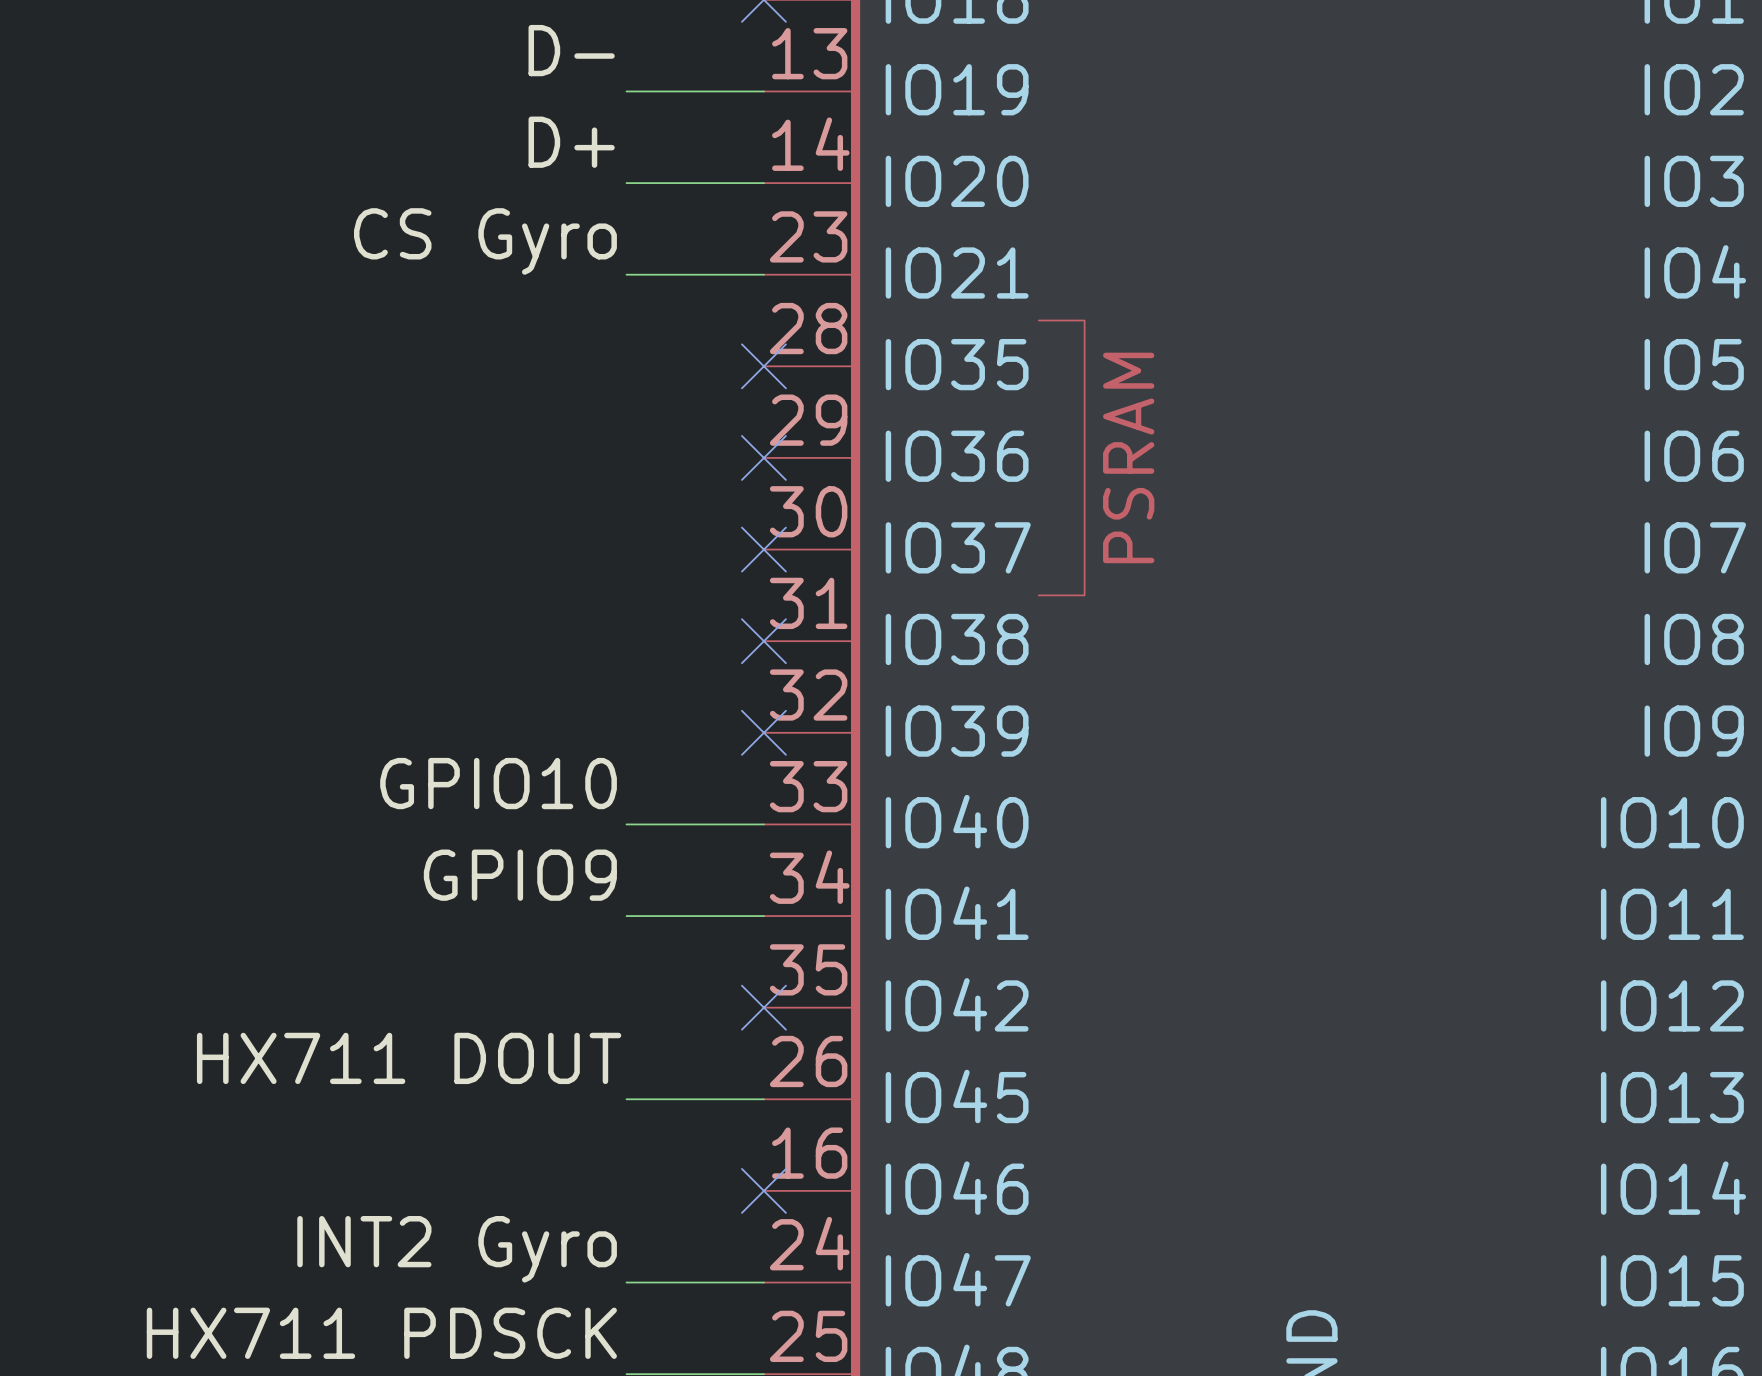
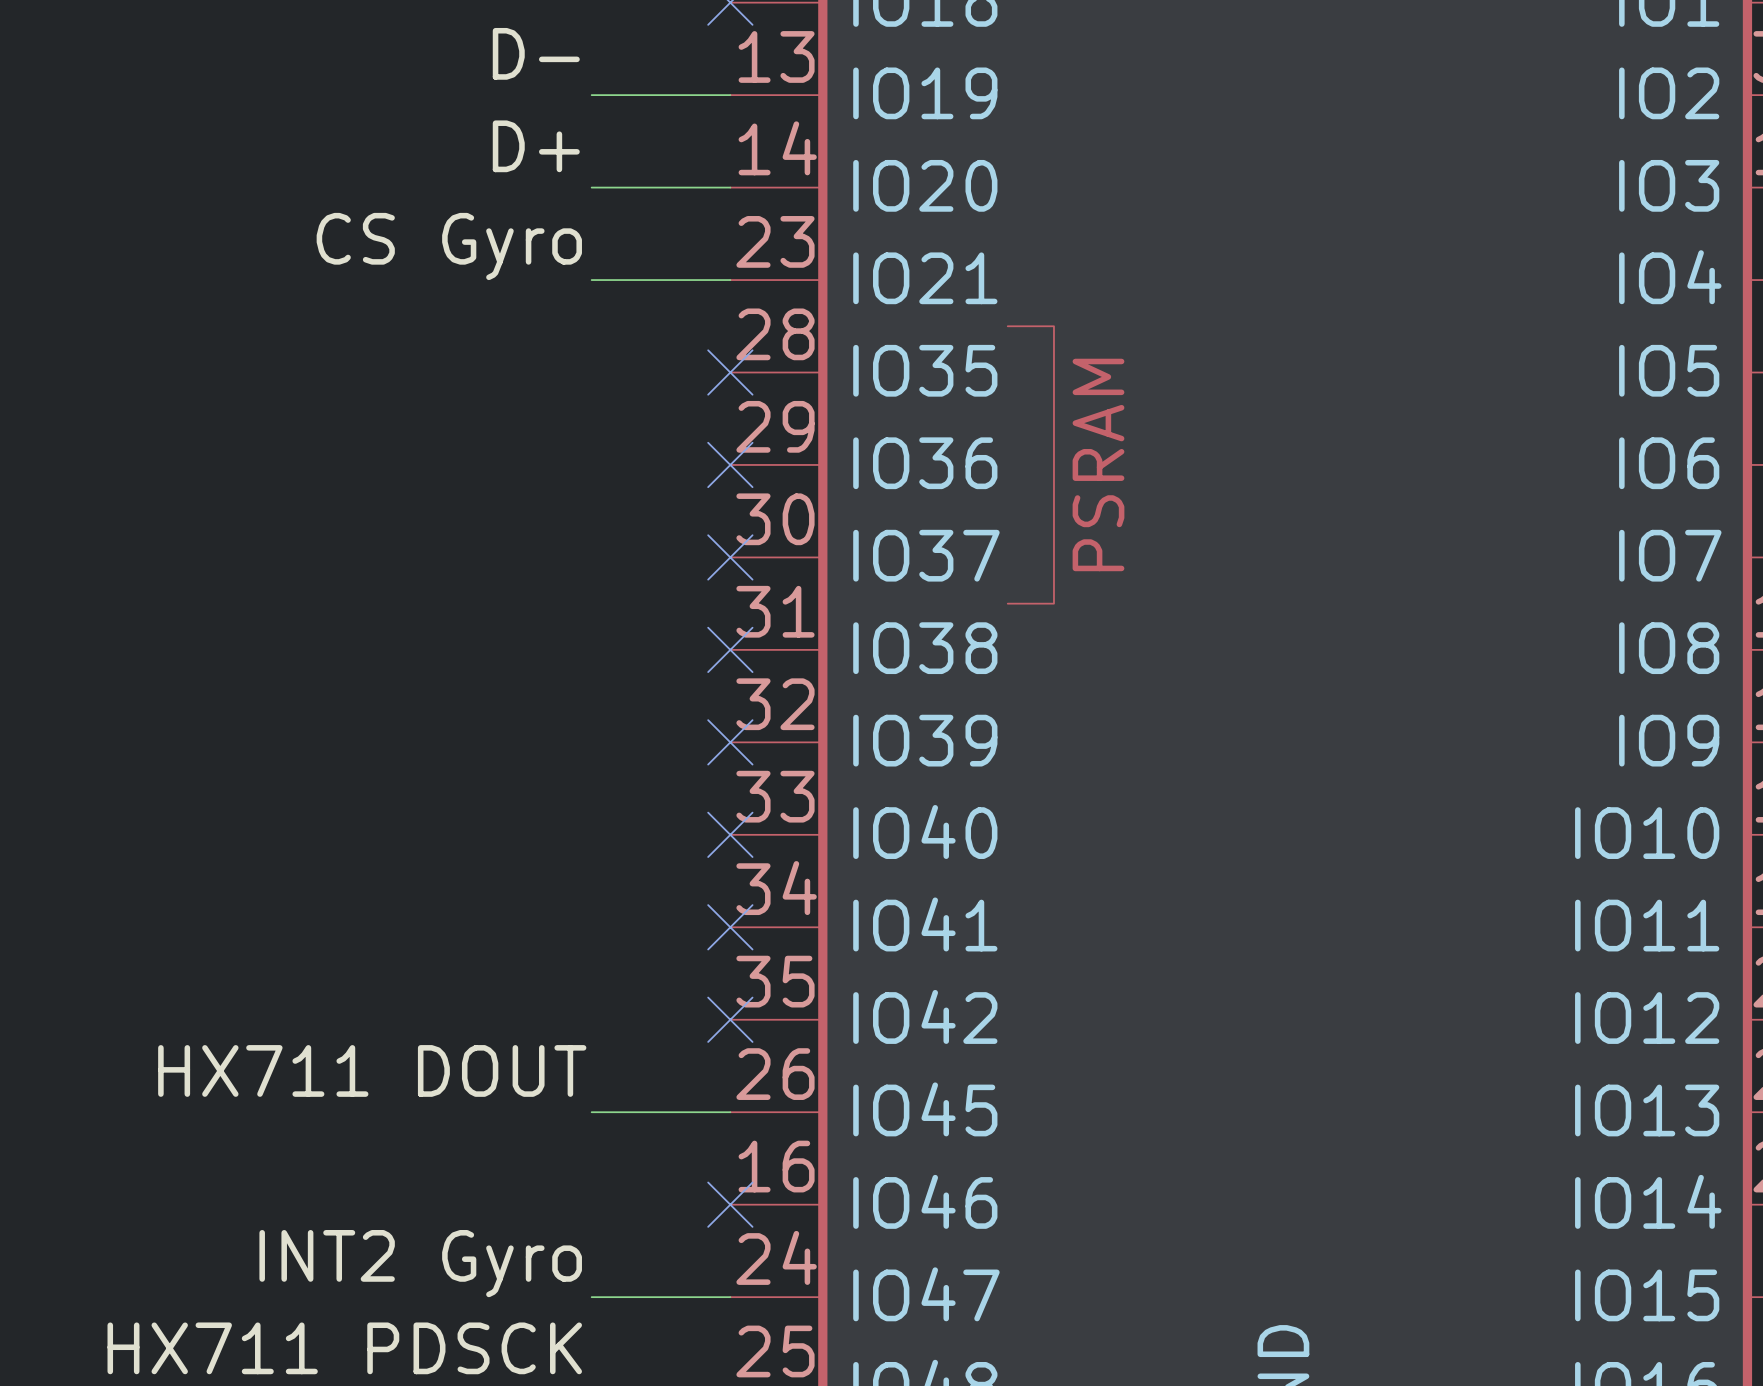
label: GPIO10 (498, 783) -> none
wire: (626, 824) (763, 824) -> none
no-connect mark: none -> (730, 834)
label: GPIO9 (520, 875) -> none
wire: (626, 916) (763, 916) -> none
no-connect mark: none -> (730, 927)

